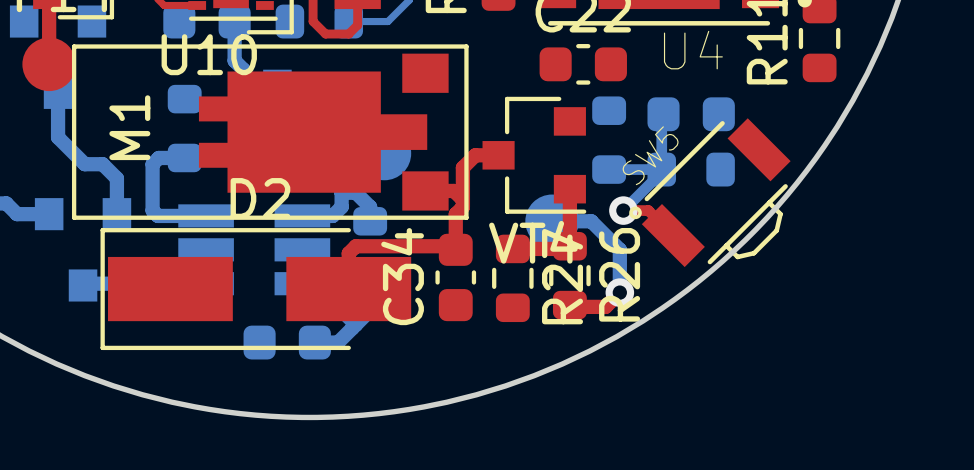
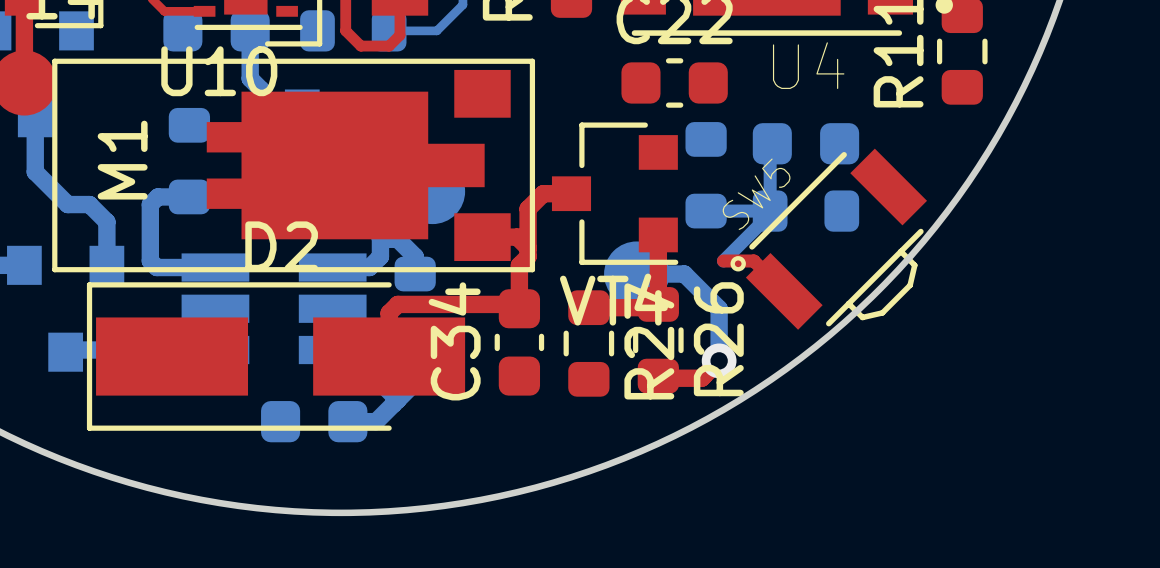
via: (623, 210) -> none

